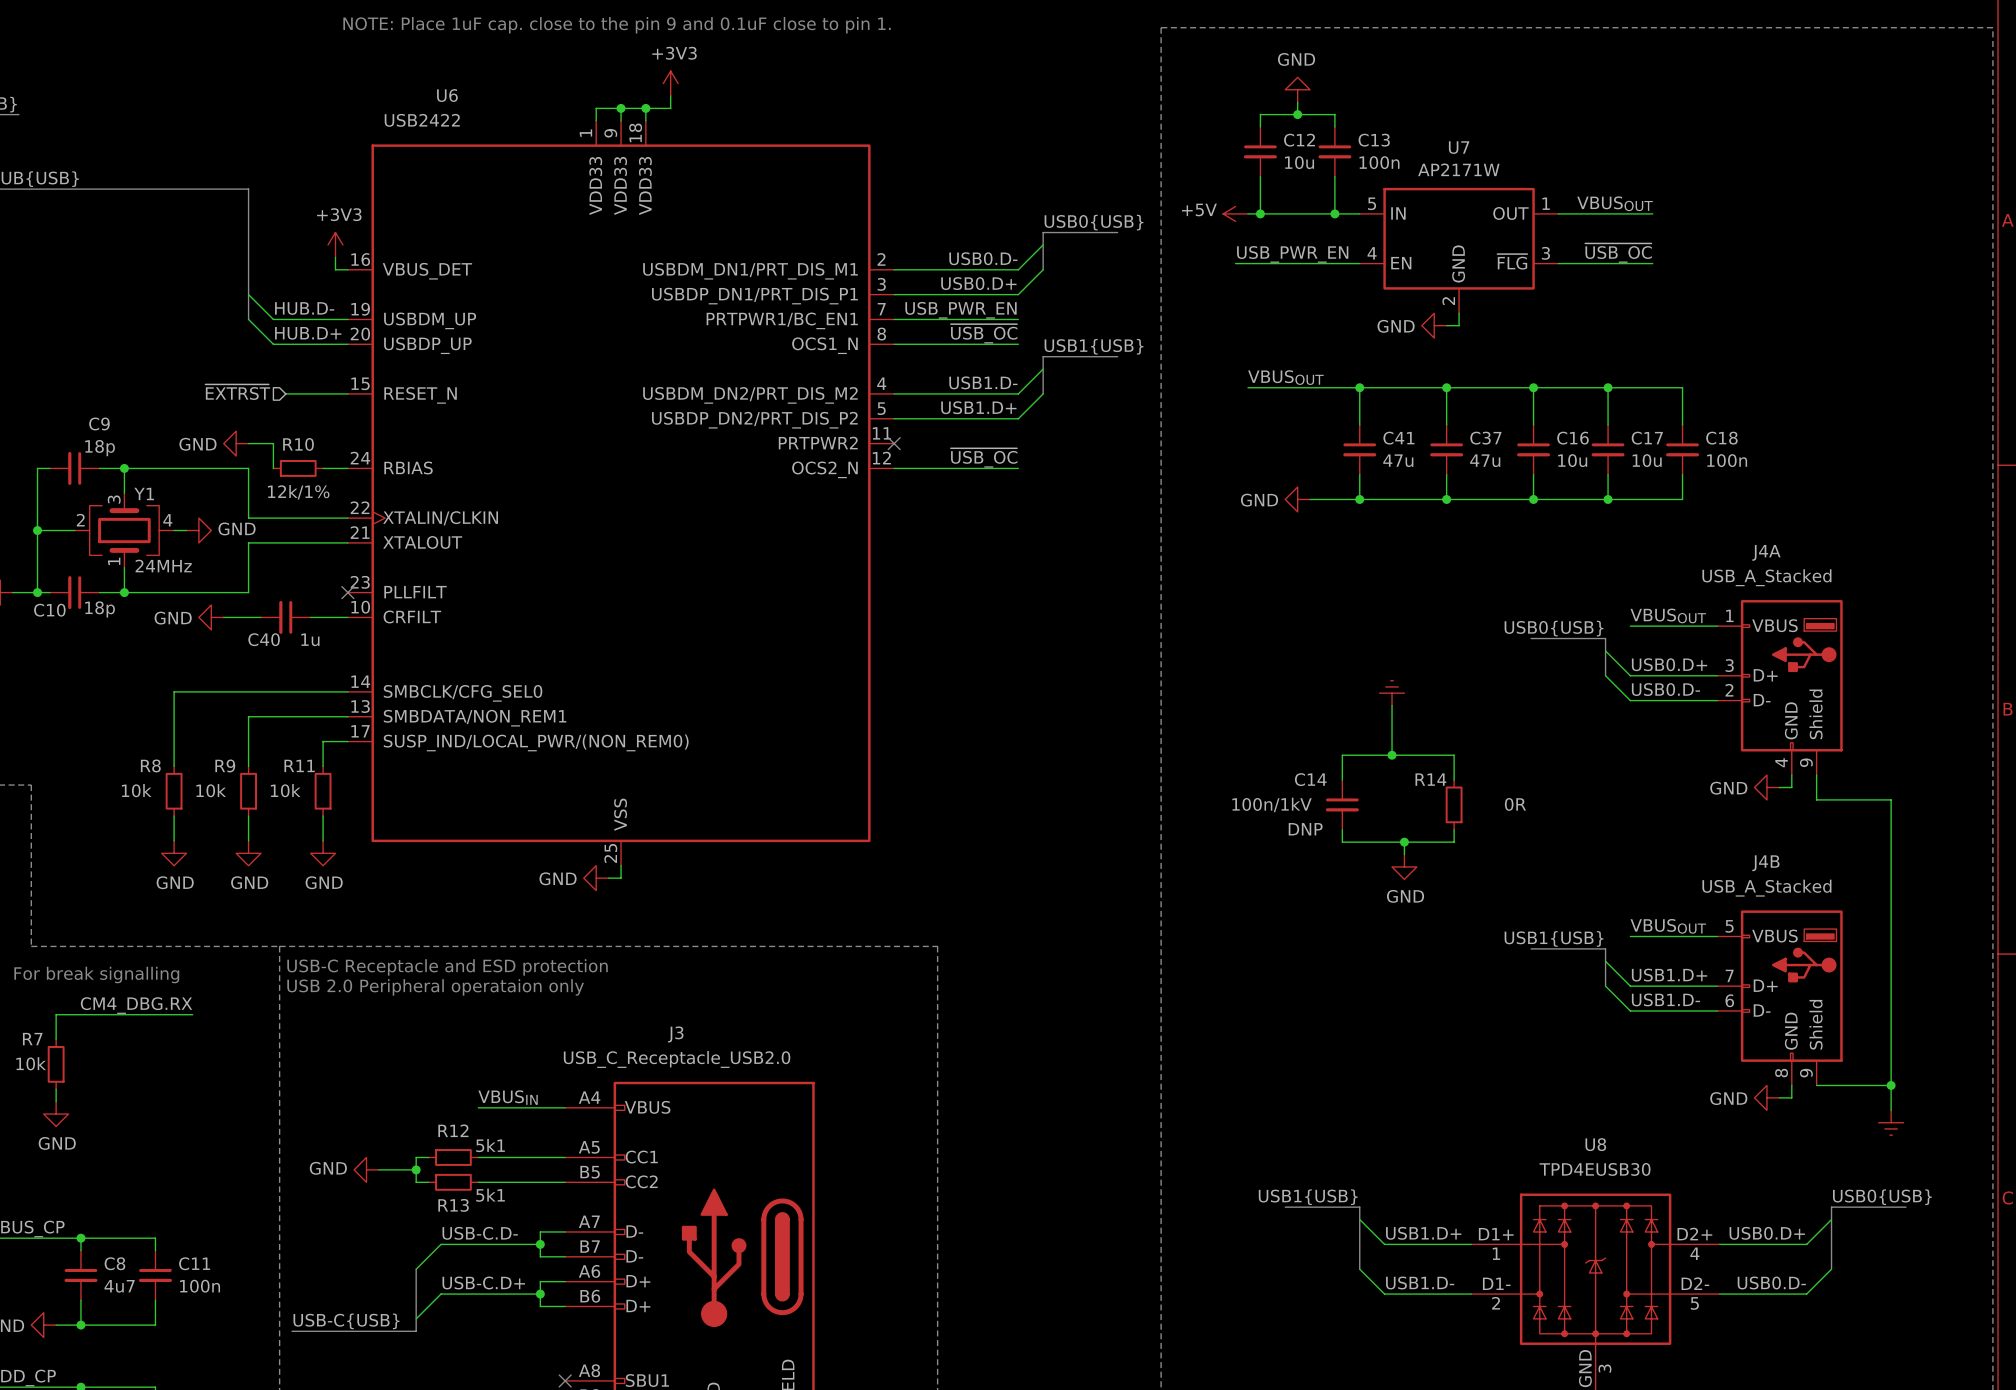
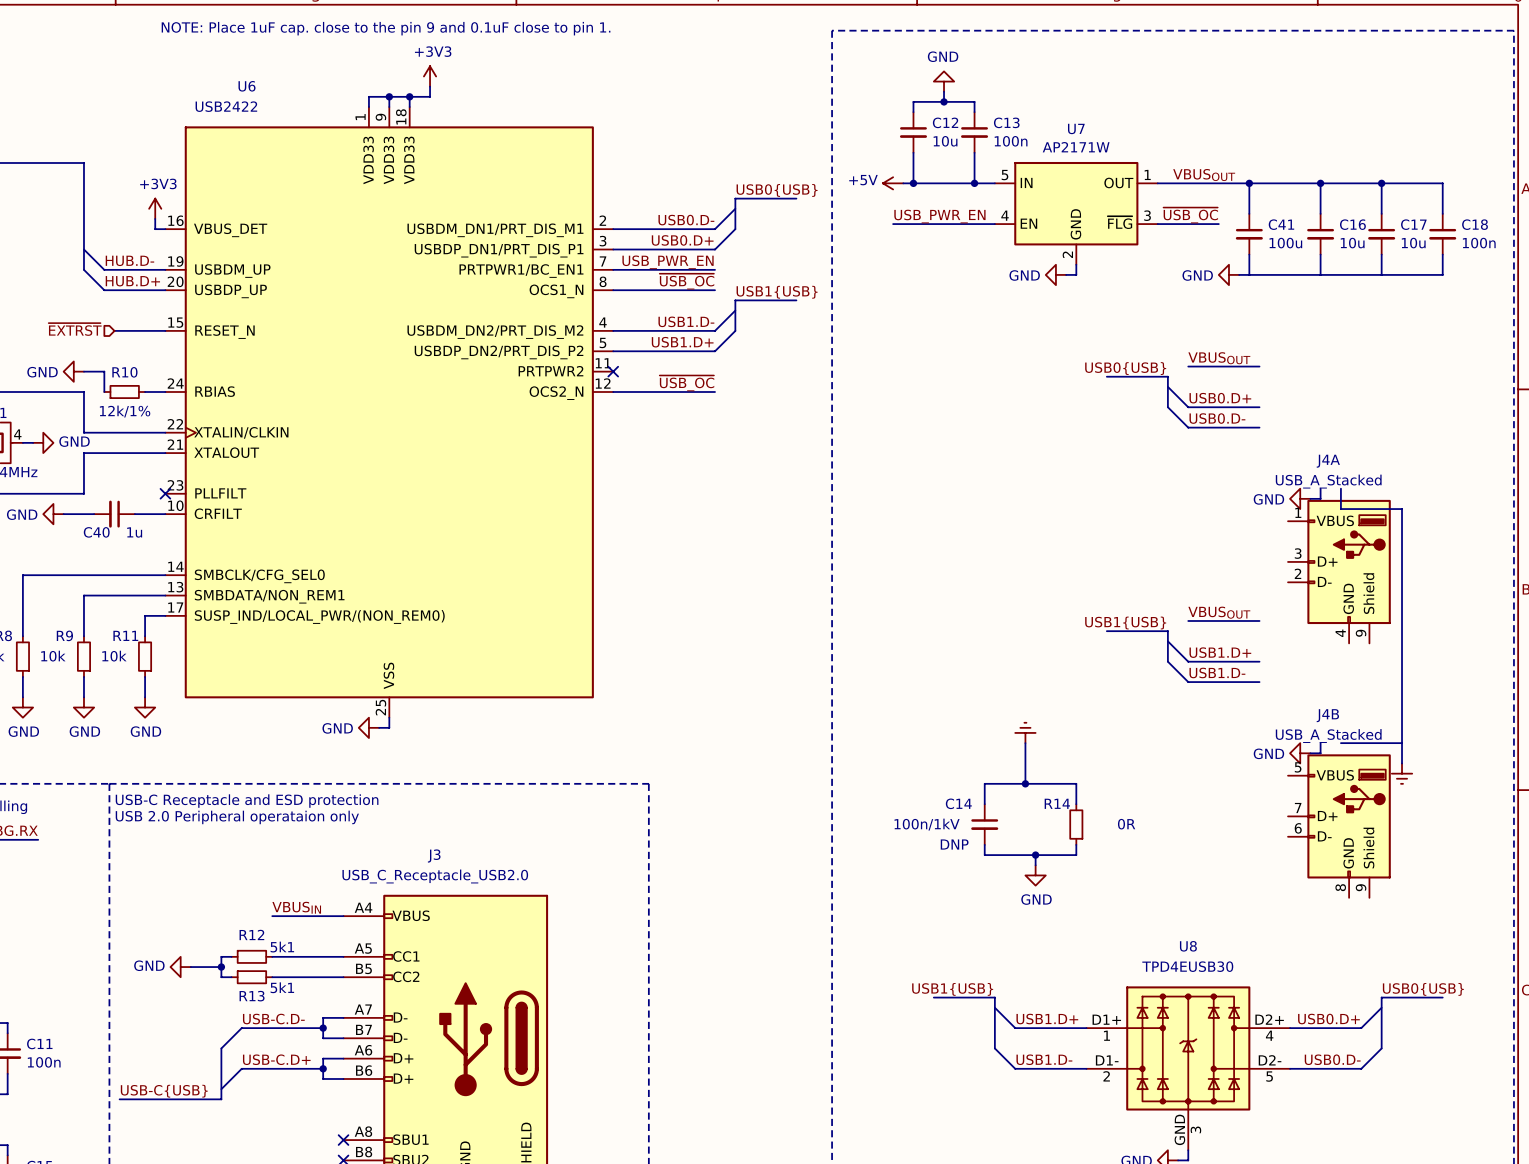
wire: none -> (1235, 183) (1442, 183) (1442, 213)
junction: none -> (1249, 183)
wire: none -> (1320, 183) (1320, 213)
junction: none -> (1320, 183)
wire: none -> (1381, 183) (1381, 213)
junction: none -> (1381, 183)
label position: ~{USB_OC} (1618, 253) -> ~{USB_OC} (1190, 215)
wire: (1632, 263) (1652, 263) -> none
wire: none -> (1320, 254) (1320, 274)
wire: none -> (1381, 254) (1381, 274)
wire: none -> (1442, 254) (1442, 274) (1239, 274)
power symbol: none -> GND (1228, 274)
label: VBUSOUT (1285, 377) -> none
wire: (1248, 387) (1682, 387) (1682, 424) -> none
wire: (1359, 387) (1359, 424) -> none
junction: (1359, 387) -> none
wire: (1446, 387) (1446, 424) -> none
junction: (1446, 387) -> none
wire: (1533, 387) (1533, 424) -> none
junction: (1533, 387) -> none
wire: (1608, 387) (1608, 424) -> (1249, 183) (1249, 213)
junction: (1608, 387) -> none
label: none -> VBUSOUT (1219, 358)
C41 position: (1359, 449) -> (1249, 234)
C37: 47u (1446, 449) -> none
C16 position: (1533, 449) -> (1320, 234)
C17 position: (1608, 449) -> (1381, 234)
C18 position: (1682, 449) -> (1442, 234)
C41 value: 47u (1398, 460) -> 100u (1285, 243)
wire: (1359, 474) (1359, 499) -> none
wire: (1446, 474) (1446, 499) -> none
wire: (1533, 474) (1533, 499) -> none
wire: (1608, 474) (1608, 499) -> (1249, 254) (1249, 274)
wire: (1682, 474) (1682, 499) (1310, 499) -> none
power symbol: GND (1297, 499) -> none
junction: (1359, 499) -> none
junction: (1446, 499) -> none
junction: (1533, 499) -> none
junction: (1608, 499) -> none
power symbol: none -> GND (1300, 498)
label: VBUSOUT (1668, 615) -> none
wire: (1630, 626) (1717, 626) -> (1188, 366) (1259, 366)
label position: USB0{USB} (1554, 628) -> USB0{USB} (1125, 368)
bus: (1531, 638) (1605, 638) (1605, 675) -> (1106, 376) (1167, 376) (1167, 407)
wire: (1605, 650) (1630, 675) (1717, 675) -> (1167, 386) (1188, 407) (1259, 407)
label position: USB0.D+ (1669, 664) -> USB0.D+ (1220, 398)
wire: (1605, 675) (1630, 700) (1717, 700) -> (1167, 407) (1188, 427) (1259, 427)
label position: USB0.D- (1665, 689) -> USB0.D- (1217, 418)
power symbol position: (1392, 693) -> (1025, 732)
wire: (1392, 705) (1392, 755) -> (1025, 743) (1025, 783)
label: none -> VBUSOUT (1219, 612)
junction: (1392, 755) -> none
wire: (1791, 775) (1791, 787) (1779, 787) -> (1320, 488) (1320, 498) (1310, 498)
wire: (1816, 775) (1816, 799) (1891, 799) (1891, 1110) -> (1340, 488) (1340, 509) (1402, 509) (1402, 763)
wire: (1342, 780) (1342, 755) (1454, 755) (1454, 780) -> (984, 804) (984, 783) (1076, 783) (1076, 804)
power symbol: GND (1766, 787) -> none
C14 position: (1342, 804) -> (984, 824)
R14 position: (1454, 804) -> (1076, 824)
wire: (1342, 829) (1342, 842) (1454, 842) (1454, 829) -> (984, 844) (984, 855) (1076, 855) (1076, 844)
wire: (1404, 842) (1404, 854) -> (1035, 855) (1035, 865)
junction: (1404, 842) -> none
power symbol: GND (1404, 866) -> none
power symbol: none -> GND (1300, 753)
label: VBUSOUT (1668, 926) -> none
wire: (1630, 936) (1717, 936) -> (1188, 620) (1259, 620)
label position: USB1{USB} (1554, 938) -> USB1{USB} (1125, 623)
junction: none -> (1025, 783)
bus: (1531, 948) (1605, 948) (1605, 986) -> (1106, 631) (1167, 631) (1167, 661)
wire: (1605, 961) (1630, 986) (1717, 986) -> (1167, 641) (1188, 661) (1259, 661)
label position: USB1.D+ (1669, 975) -> USB1.D+ (1220, 652)
wire: (1605, 986) (1630, 1010) (1717, 1010) -> (1167, 661) (1188, 682) (1259, 682)
label position: USB1.D- (1665, 999) -> USB1.D- (1217, 672)
junction: none -> (1035, 855)
power symbol: none -> GND (1035, 875)
wire: (1791, 1085) (1791, 1097) (1779, 1097) -> (1320, 743) (1320, 753) (1310, 753)
wire: (1816, 1085) (1891, 1085) -> (1340, 743) (1402, 743)
junction: (1891, 1085) -> none
power symbol: GND (1766, 1097) -> none
power symbol position: (1891, 1122) -> (1402, 773)

